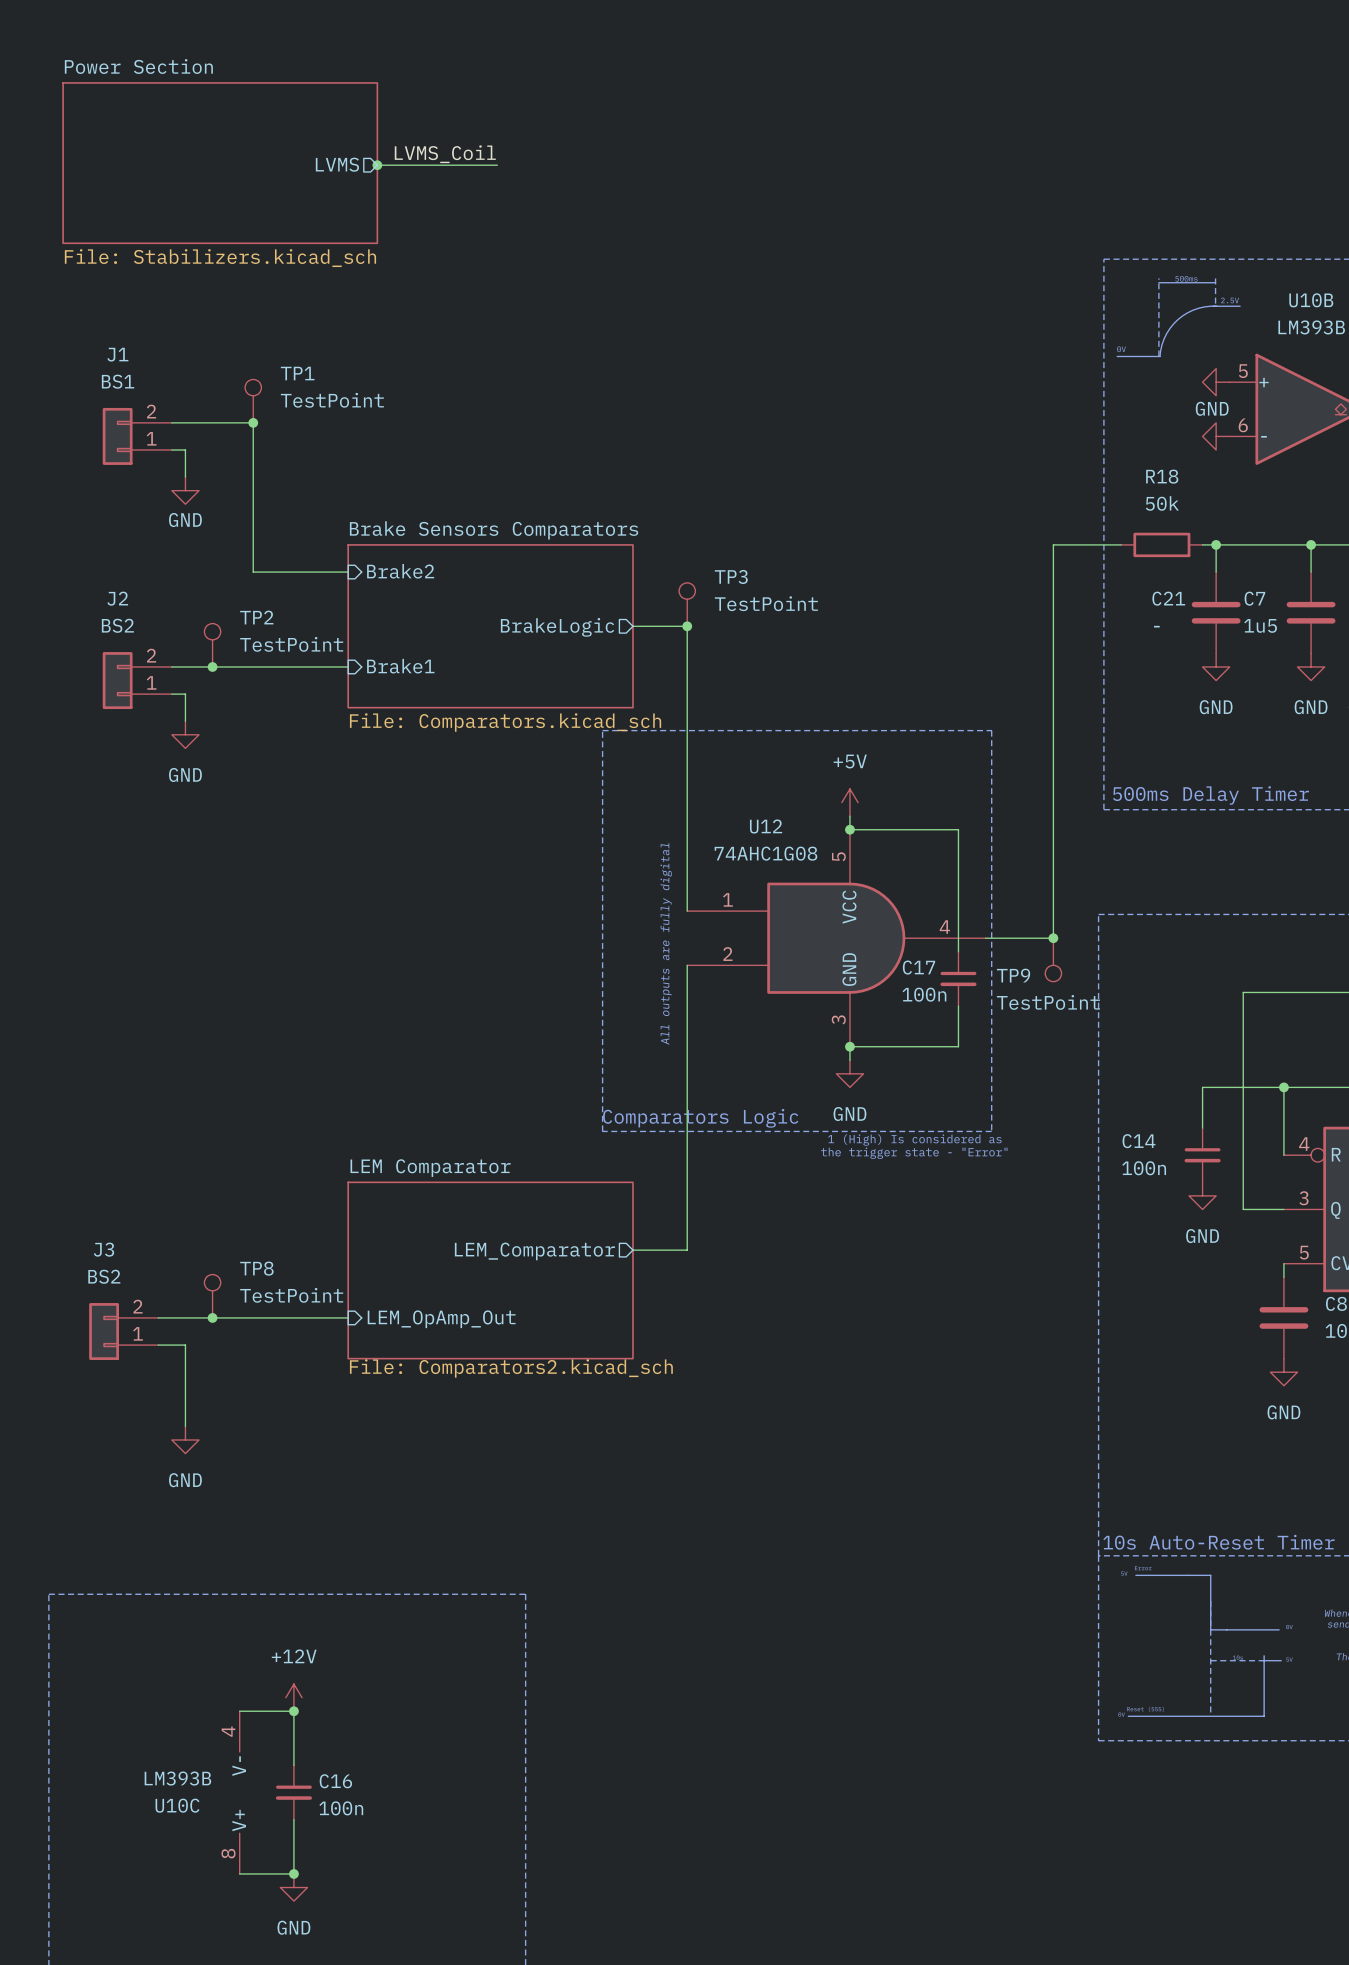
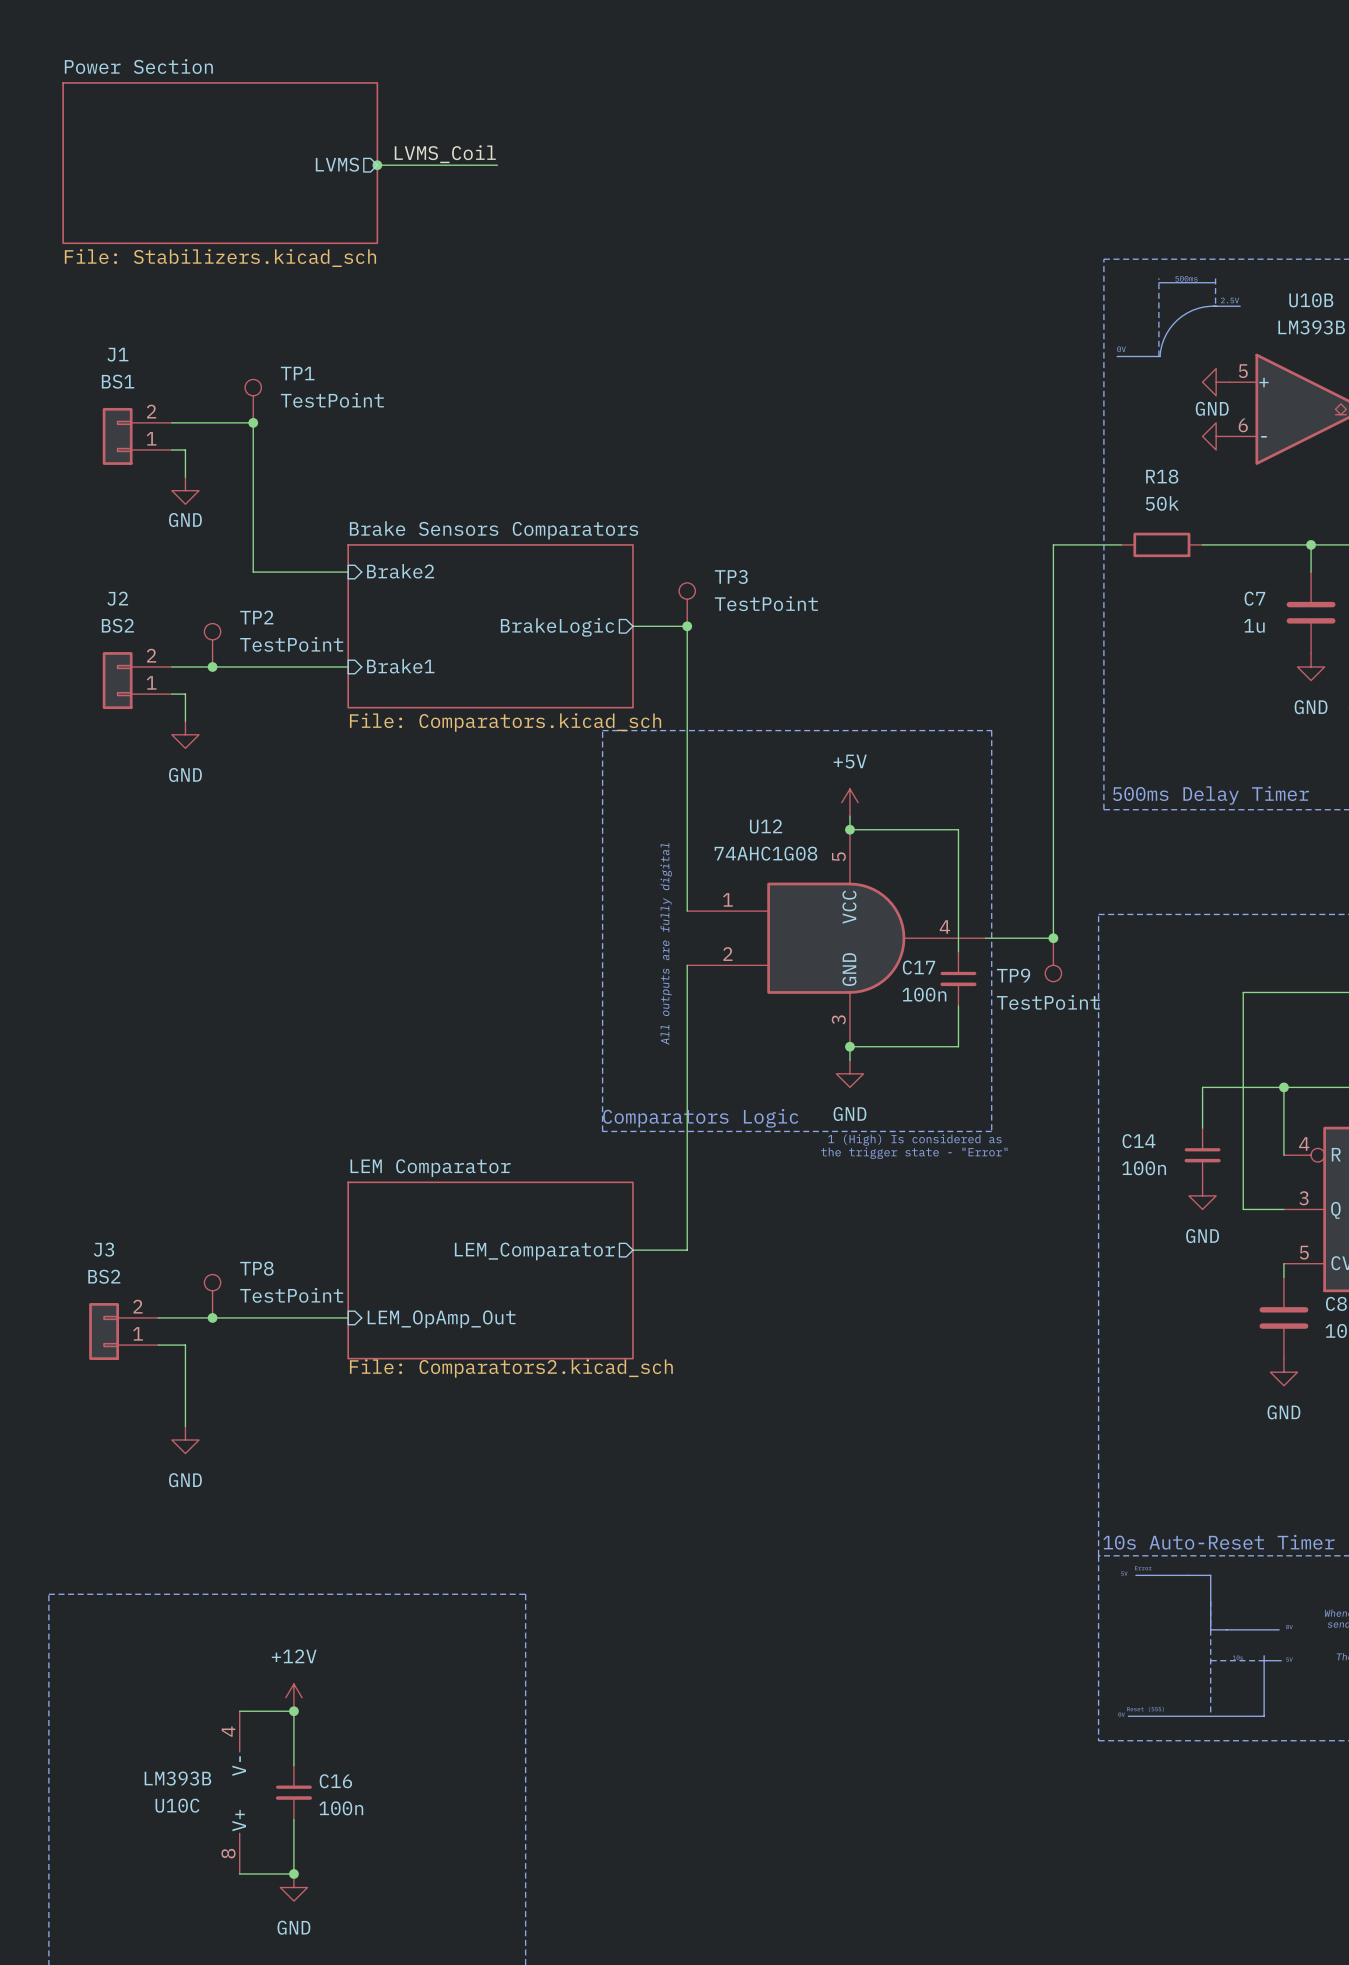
wire: (1216, 544) (1216, 572) -> none
junction: (1216, 544) -> none
C21: - (1216, 612) -> none
C7 value: 1u5 (1260, 625) -> 1u (1254, 625)
power symbol: GND (1216, 666) -> none

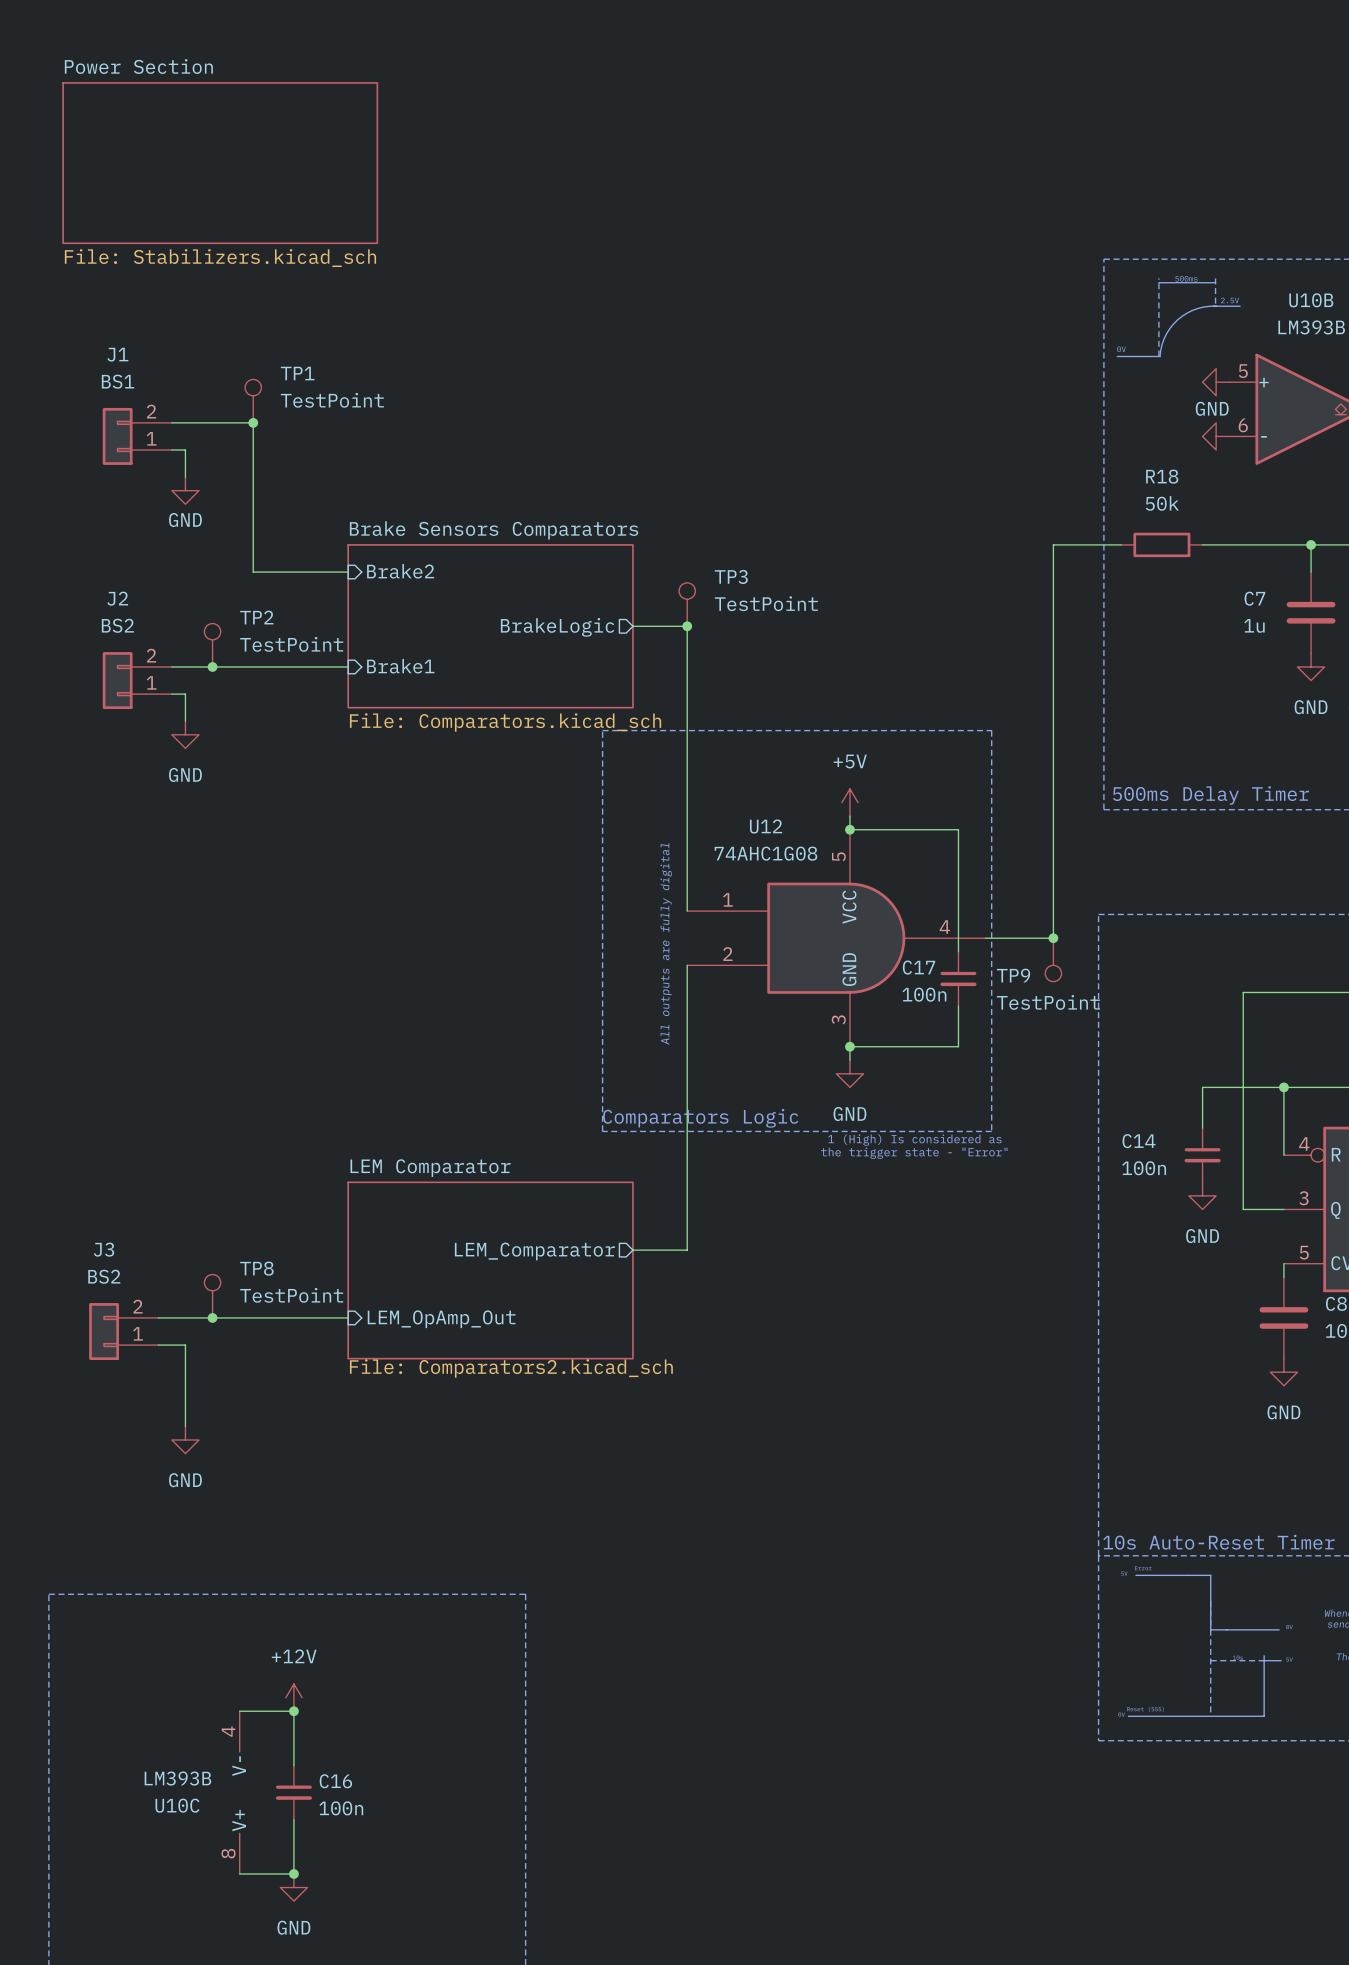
label: LVMS_Coil (445, 154) -> none
sheet pin: LVMS (337, 164) -> none
wire: (375, 165) (497, 165) -> none
junction: (377, 165) -> none

